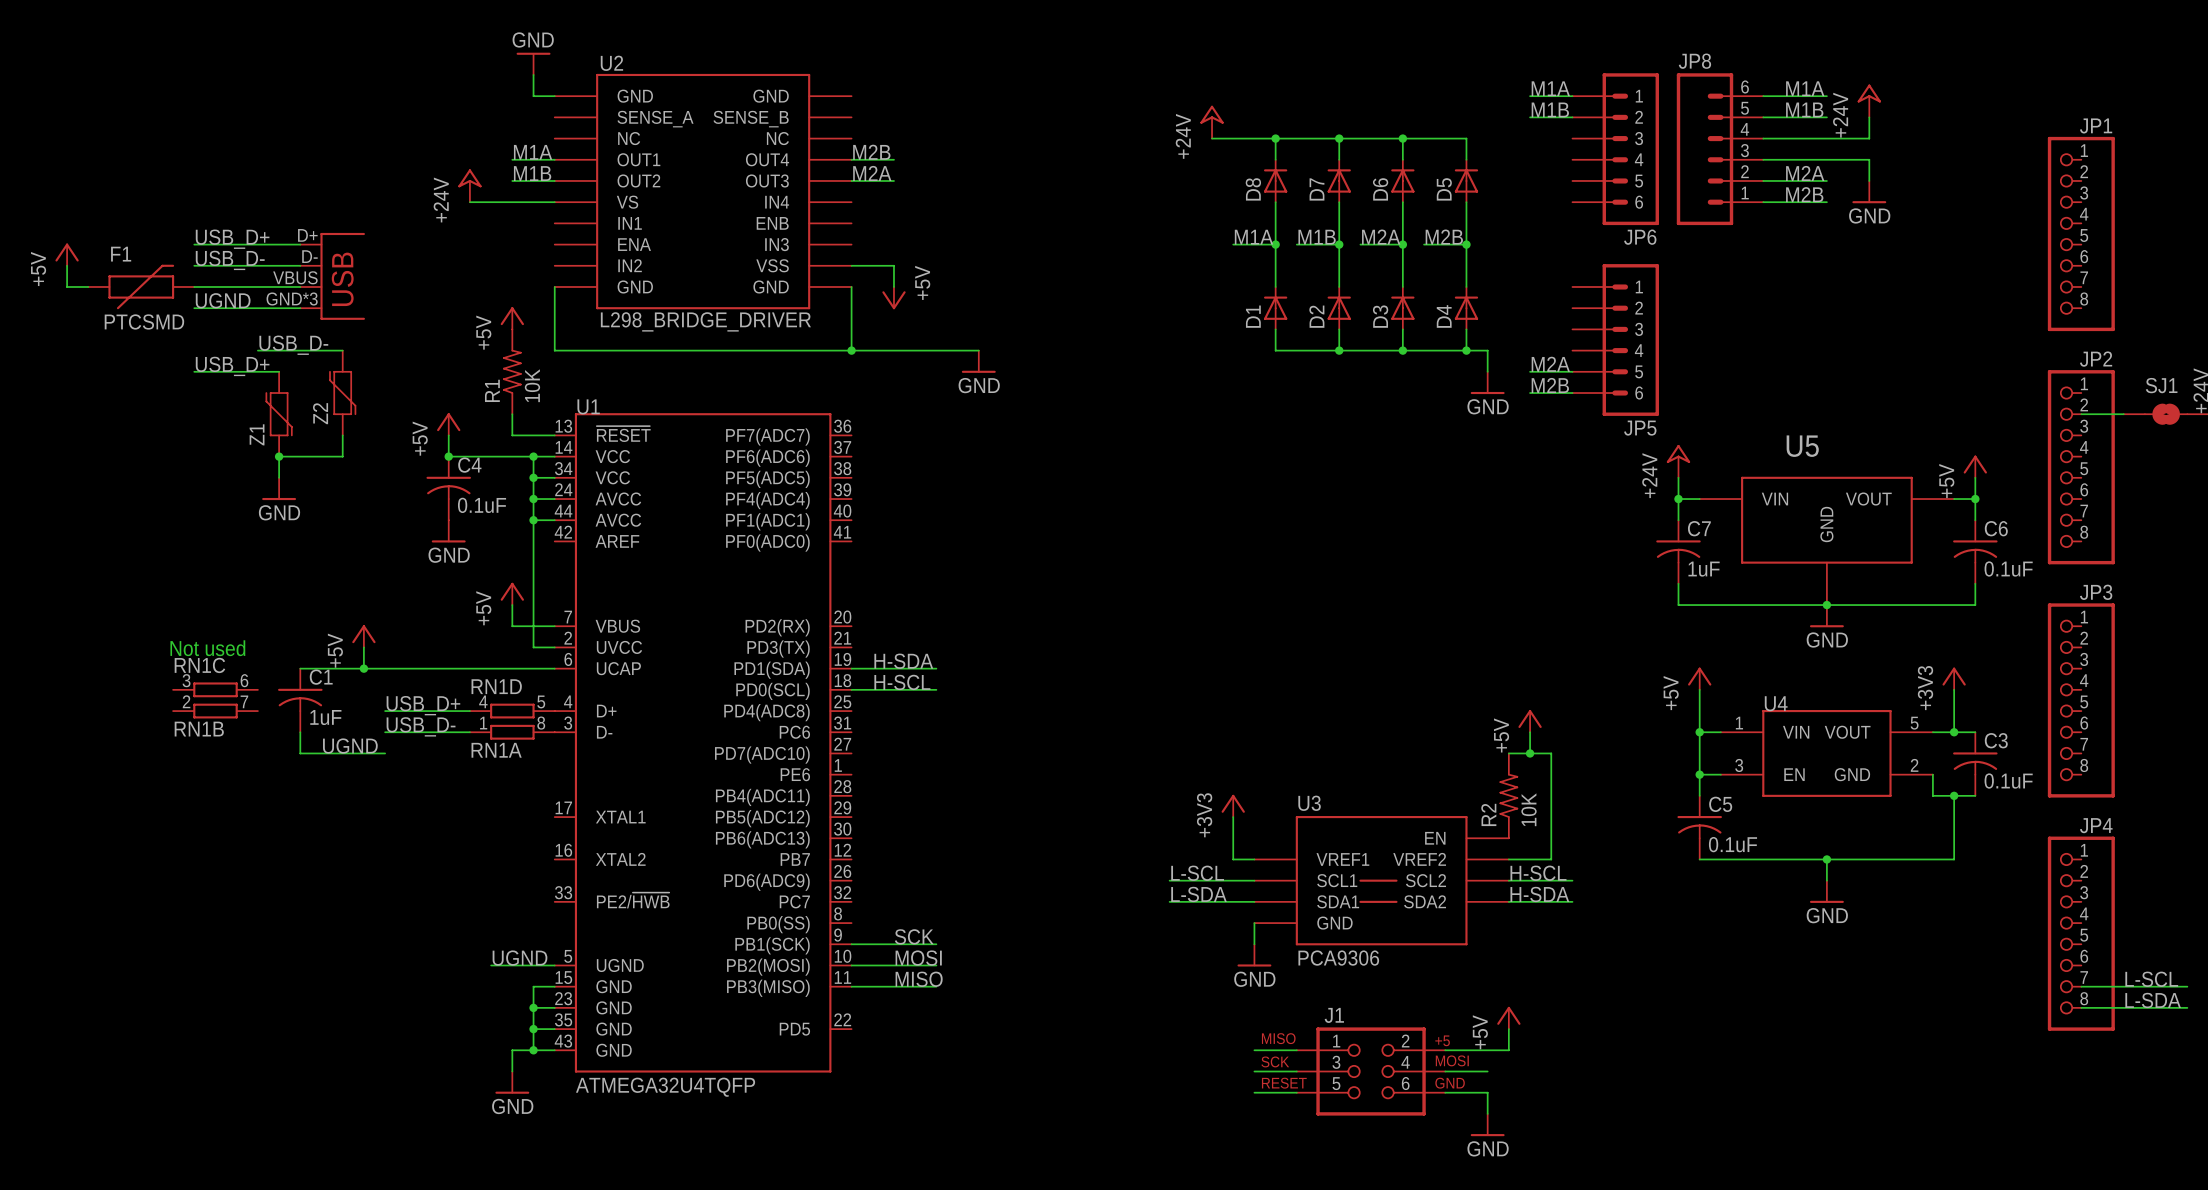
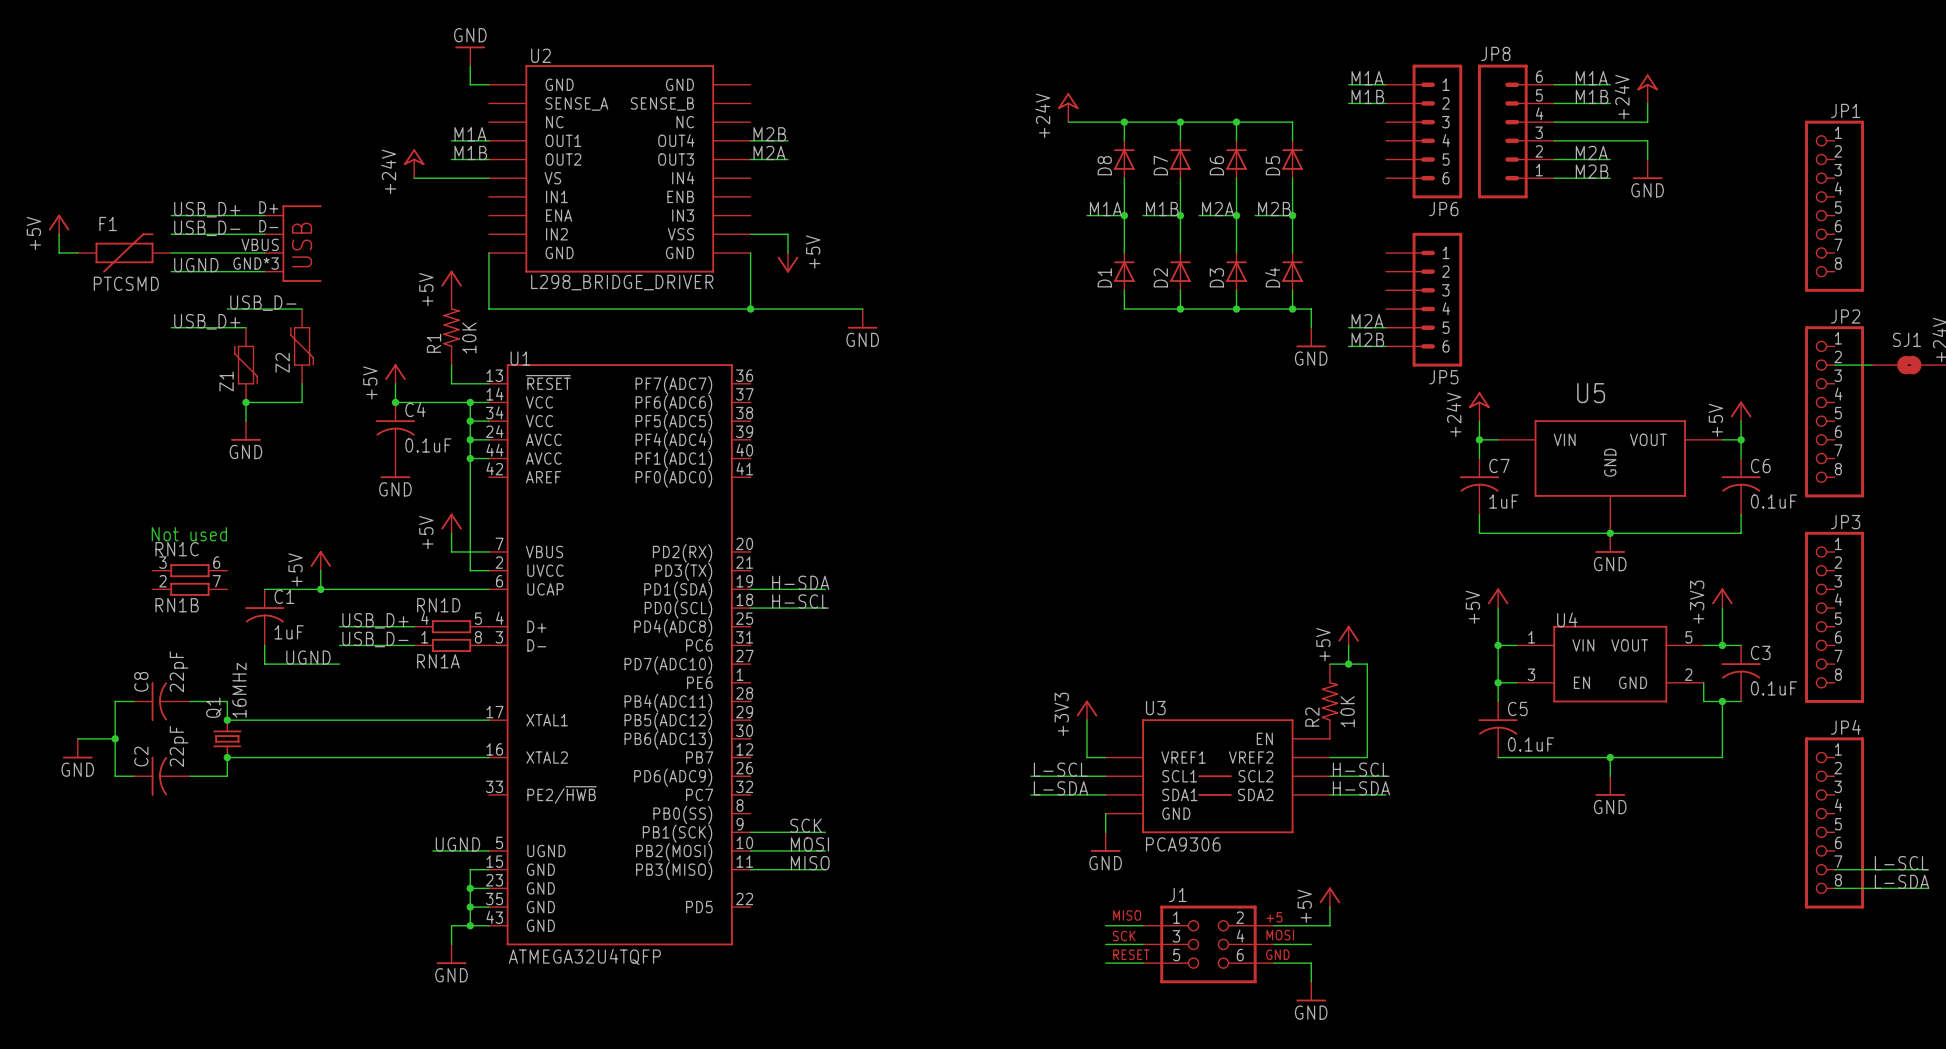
text position: Not used (207, 648) -> Not used (189, 534)
RN1C position: (215, 689) -> (189, 570)
RN1B position: (215, 711) -> (189, 589)
wire: none -> (133, 701) (115, 701) (115, 776) (133, 776)
C8: none -> 22pF (161, 701)
wire: none -> (189, 701) (227, 701) (227, 720) (488, 720)
junction: none -> (227, 720)
wire: none -> (77, 738) (115, 738)
junction: none -> (115, 738)
Q1: none -> 16MHz (227, 738)
power symbol: none -> GND (77, 748)
junction: none -> (227, 757)
wire: none -> (488, 757) (227, 757) (227, 776) (189, 776)
C2: none -> 22pF (161, 776)

